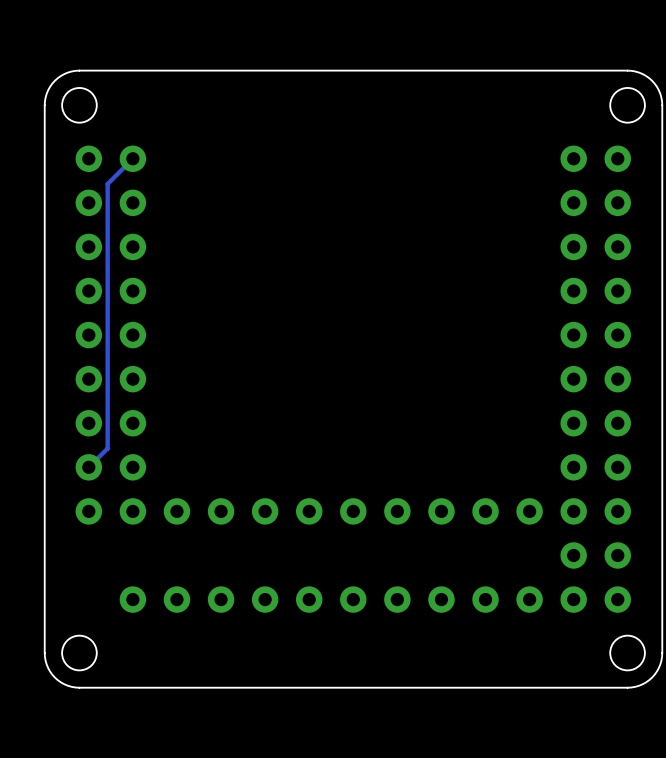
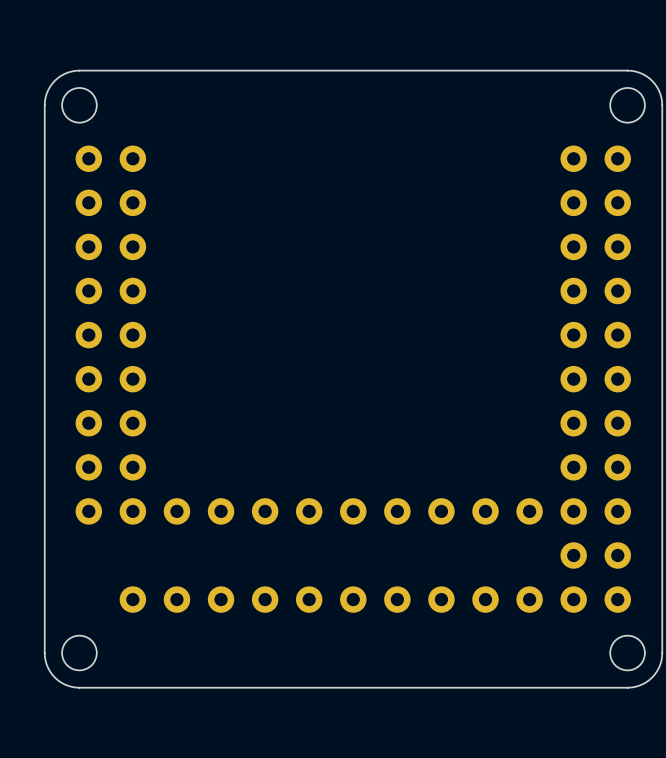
track: (132, 158) (107, 183) (107, 448) (88, 467) -> none

